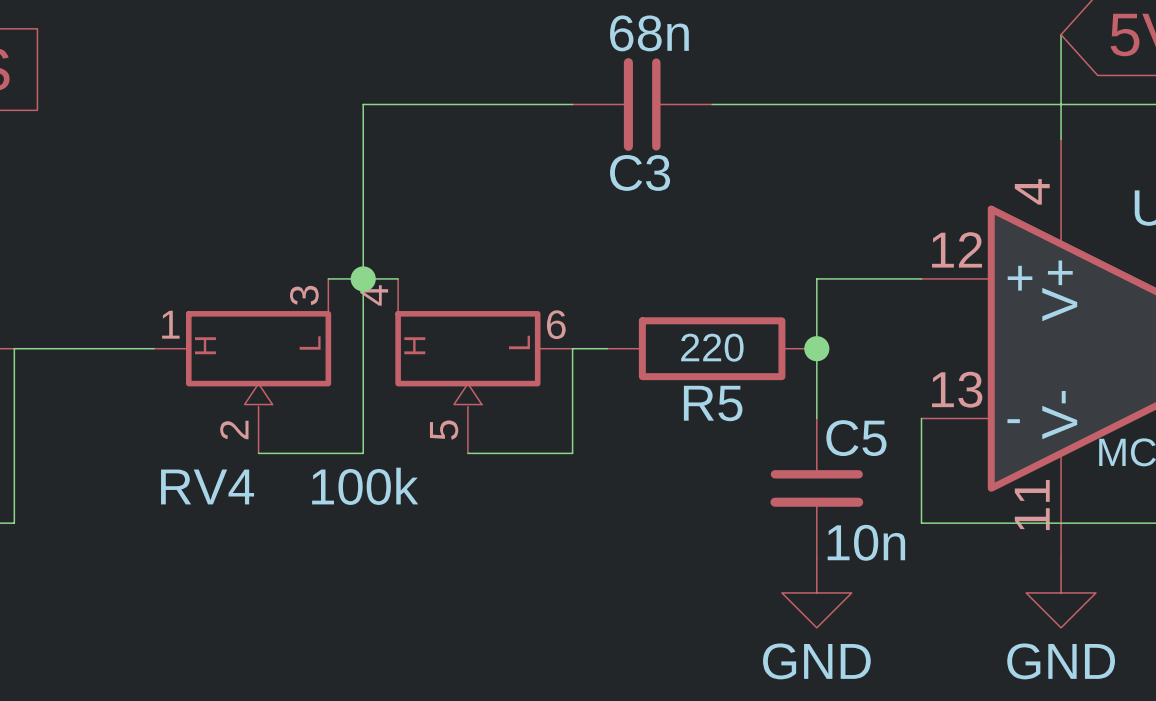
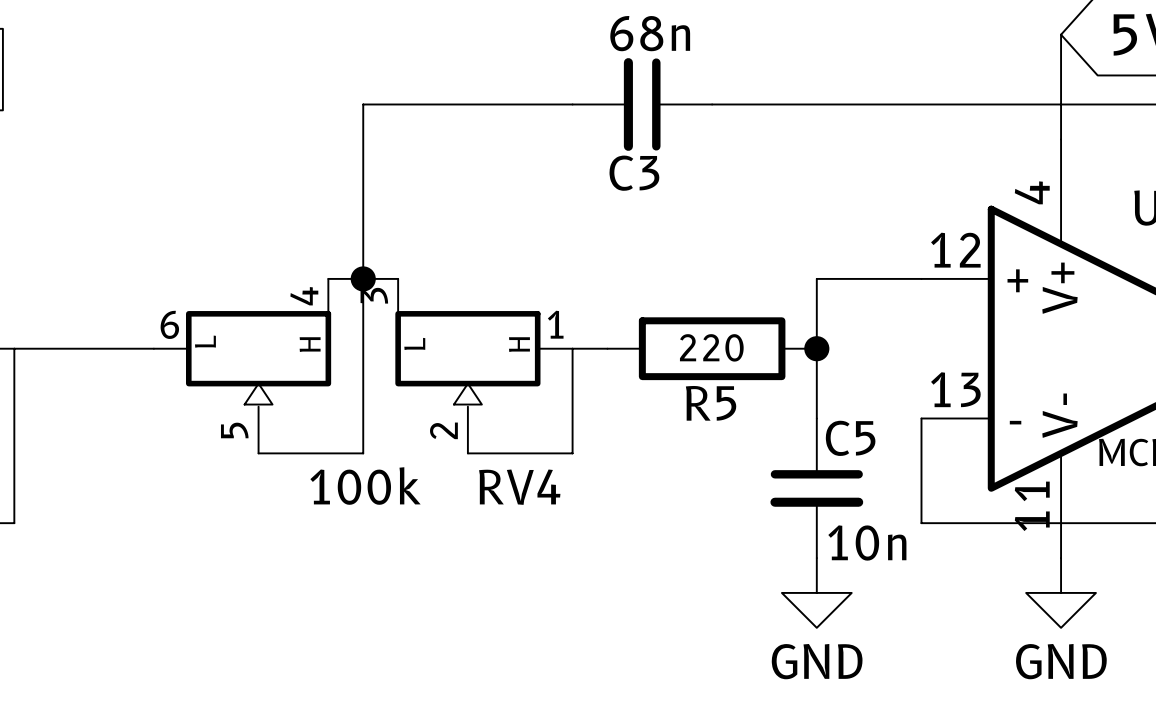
RV4 flip: as is (363, 357) -> left-right (363, 357)

